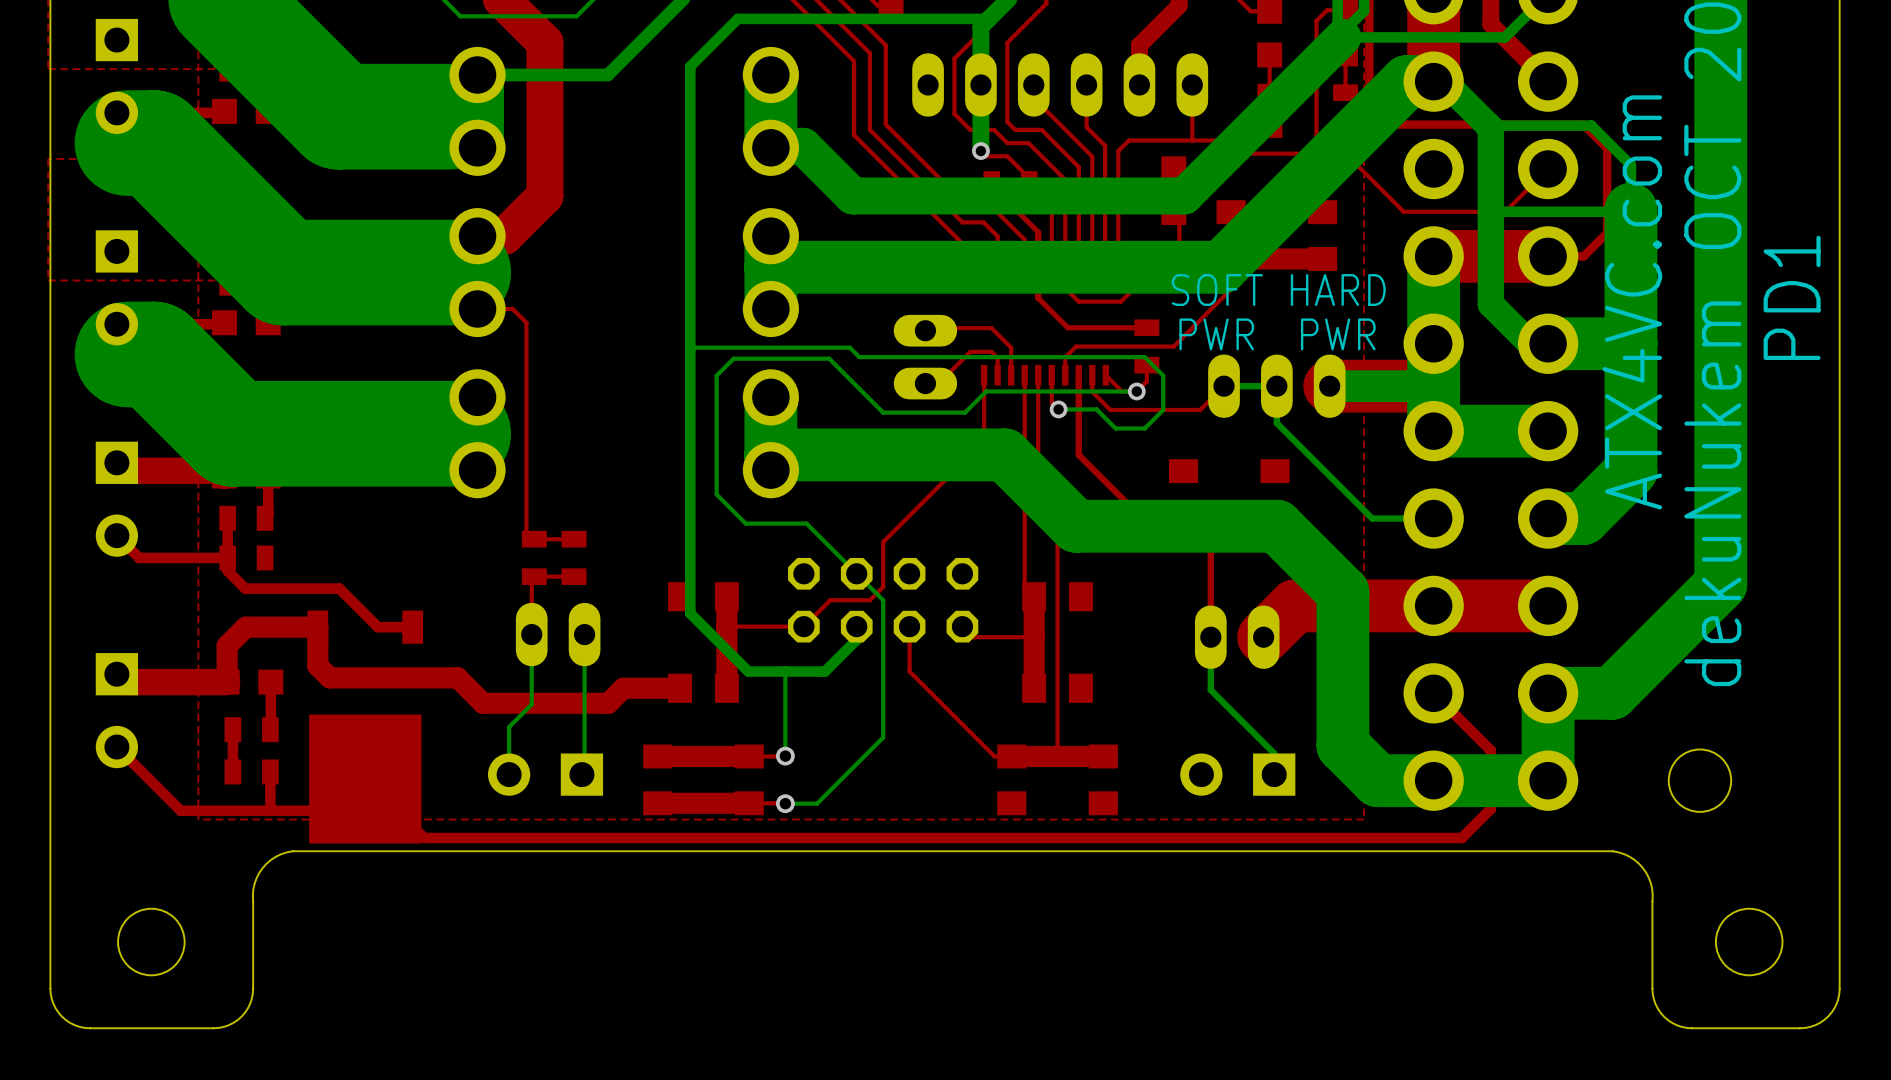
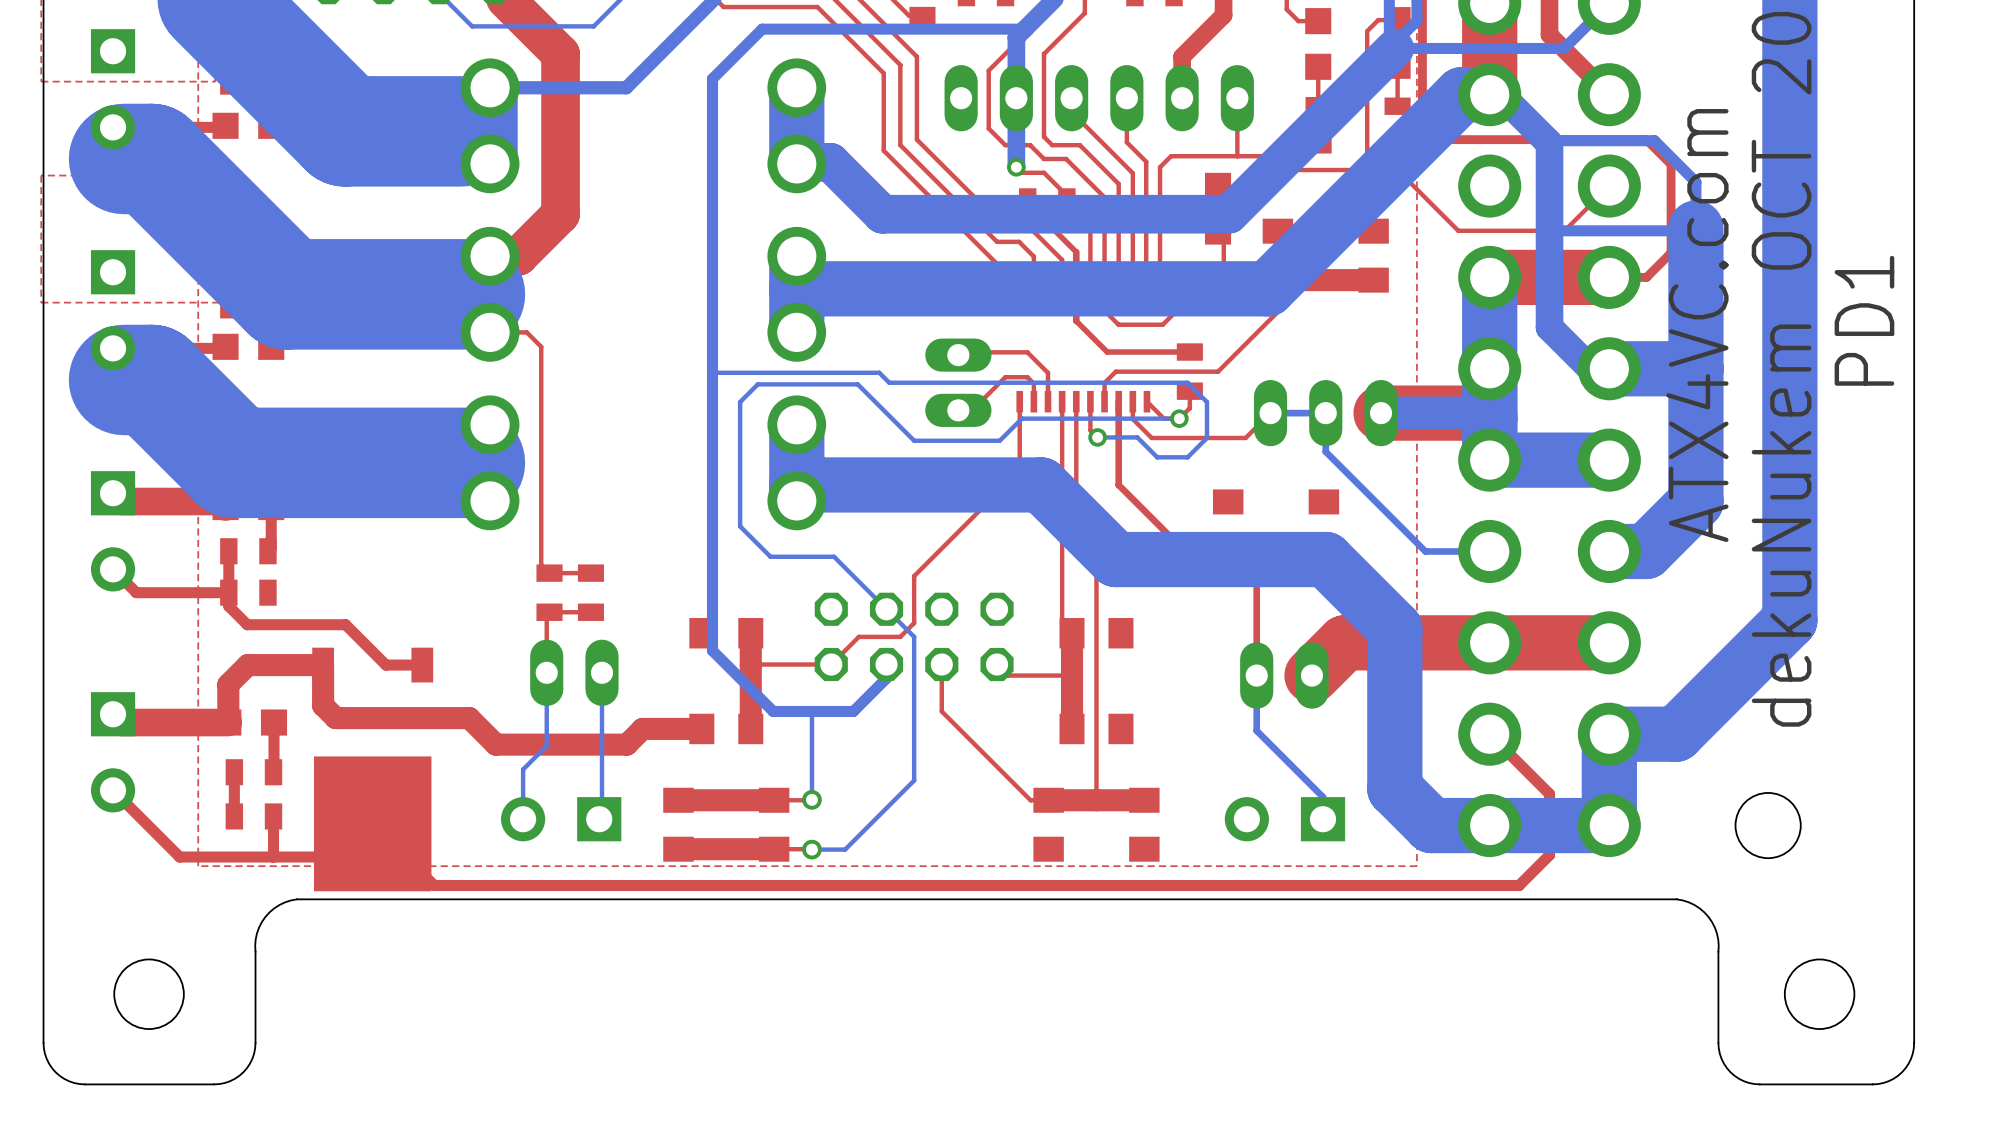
text: SOFT (1217, 290) -> none
text: HARD (1338, 290) -> none
text: PWR (1216, 334) -> none
text: PWR (1338, 334) -> none

